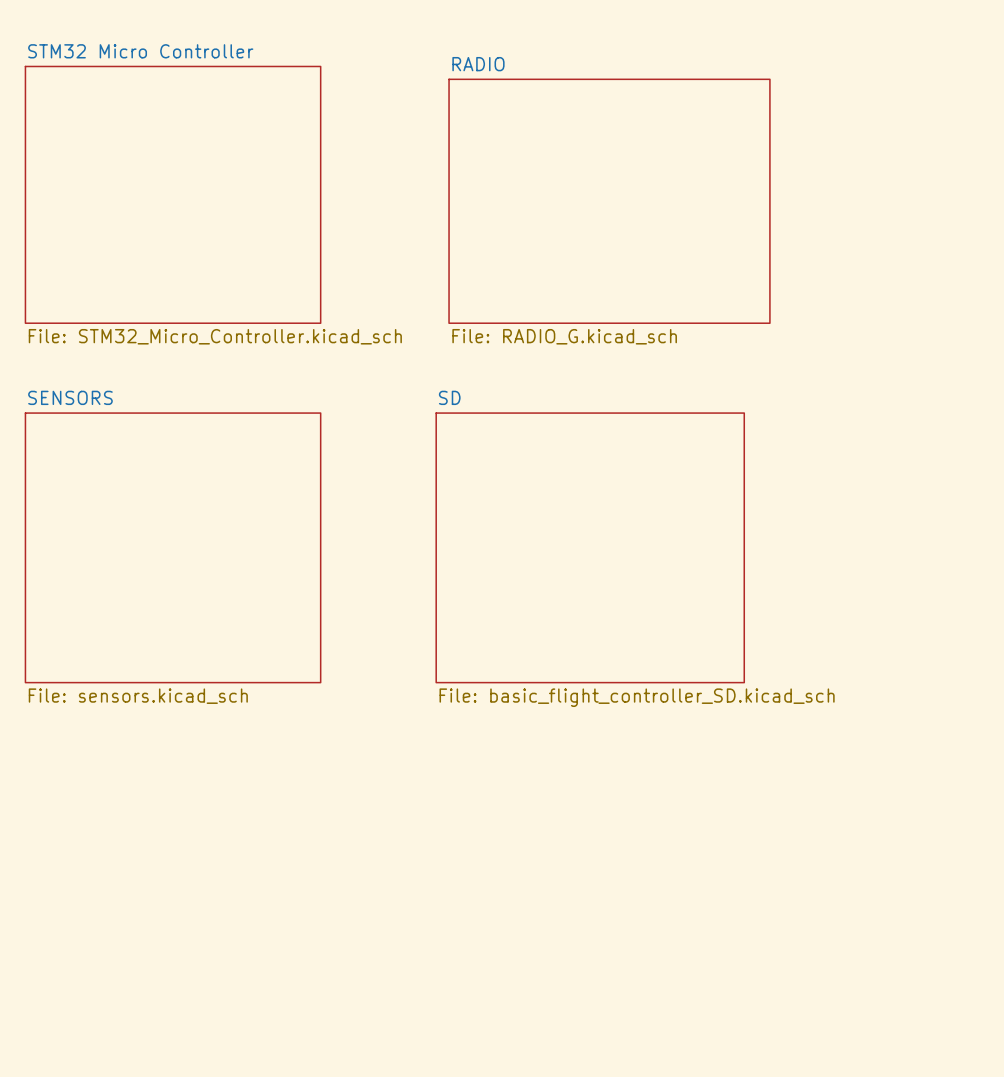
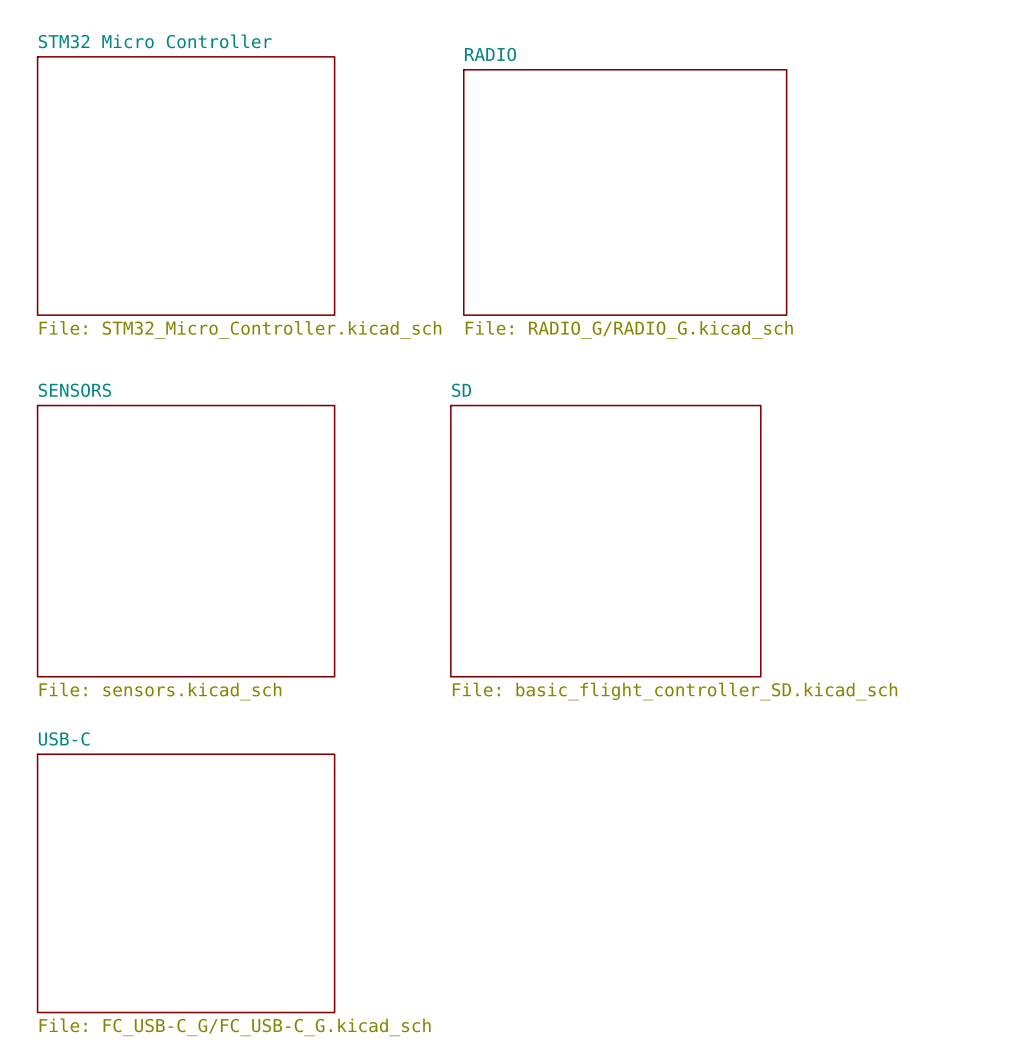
sheet RADIO value: File: RADIO_G.kicad_sch (564, 336) -> File: RADIO_G/RADIO_G.kicad_sch (629, 329)
sheet USB-C: none -> File: FC_USB-C_G/FC_USB-C_G.kicad_sch (186, 883)

